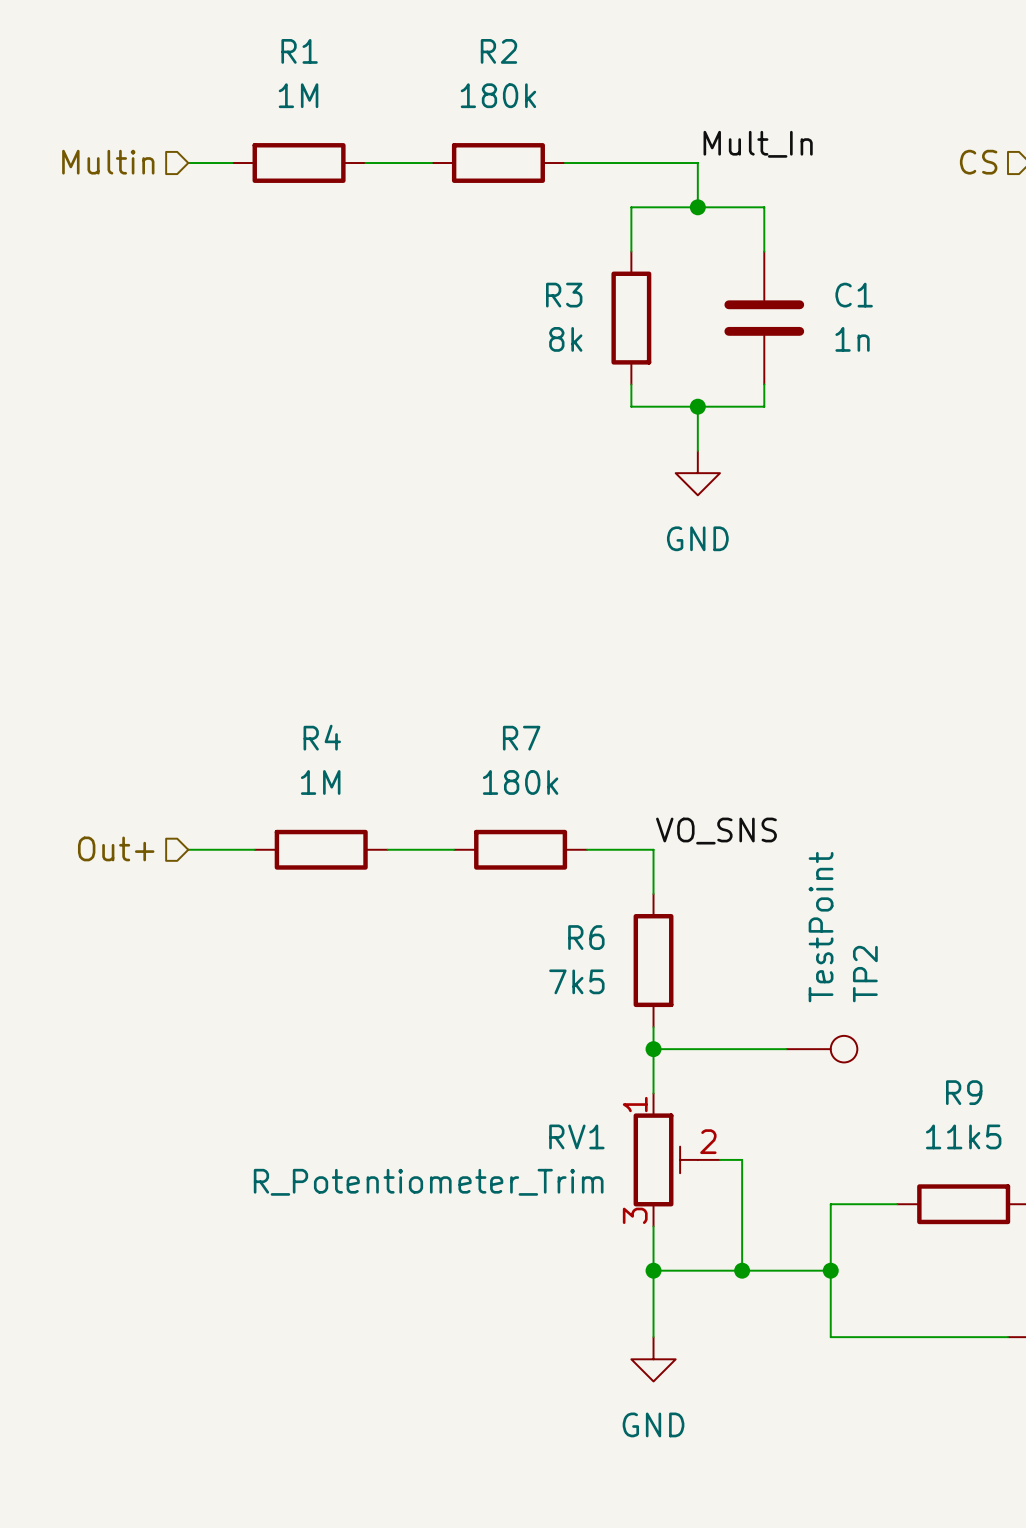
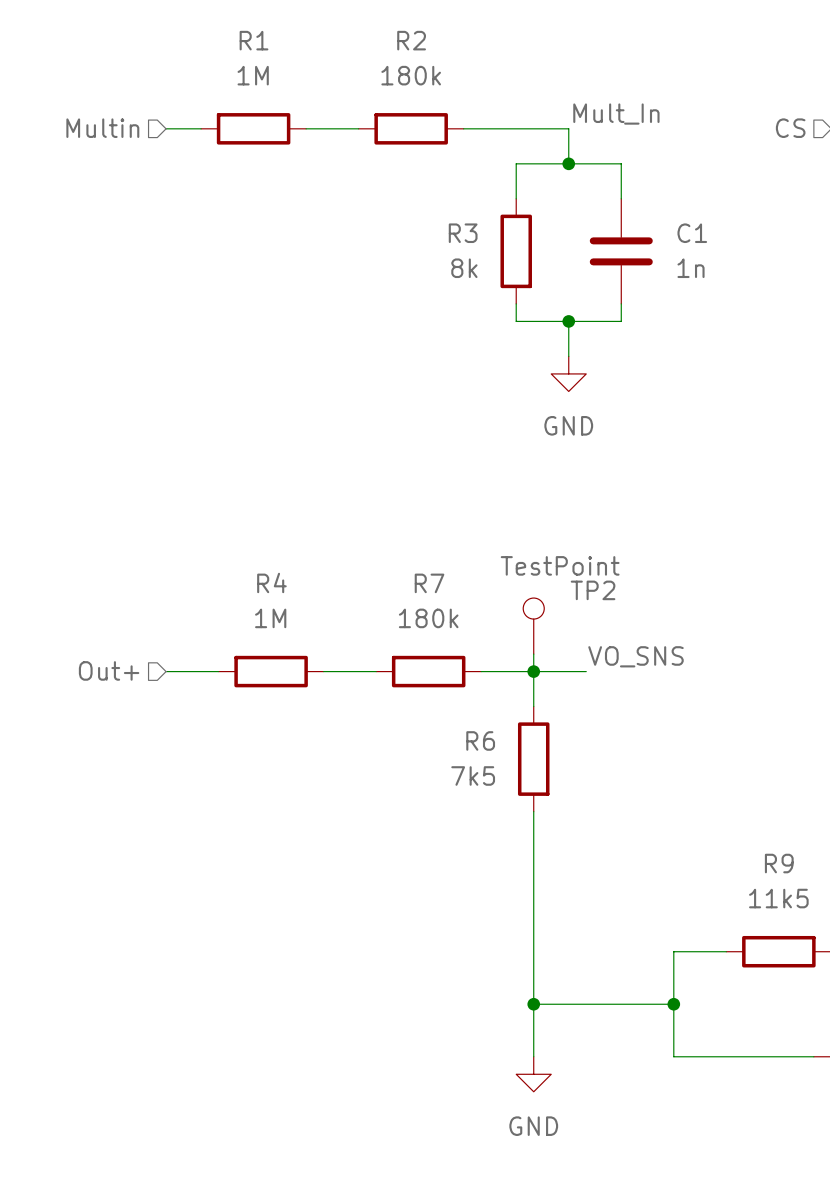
wire: none -> (533, 654) (533, 671) (586, 671)
label position: VO_SNS (716, 831) -> VO_SNS (636, 656)
junction: none -> (533, 671)
TP2 value position: TestPoint (821, 927) -> TestPoint (560, 565)
TP2 name position: TP2 (865, 974) -> TP2 (593, 590)
wire: (653, 1049) (786, 1049) -> none
junction: (653, 1049) -> none
TP2 position: (821, 1049) -> (533, 626)
TP2 rotation: 0° (844, 1049) -> 90° counterclockwise (533, 608)
wire: none -> (533, 864) (533, 969)
RV1: R_Potentiometer_Trim (676, 1159) -> none
wire: (719, 1159) (742, 1159) (742, 1270) -> none
junction: (742, 1270) -> none

